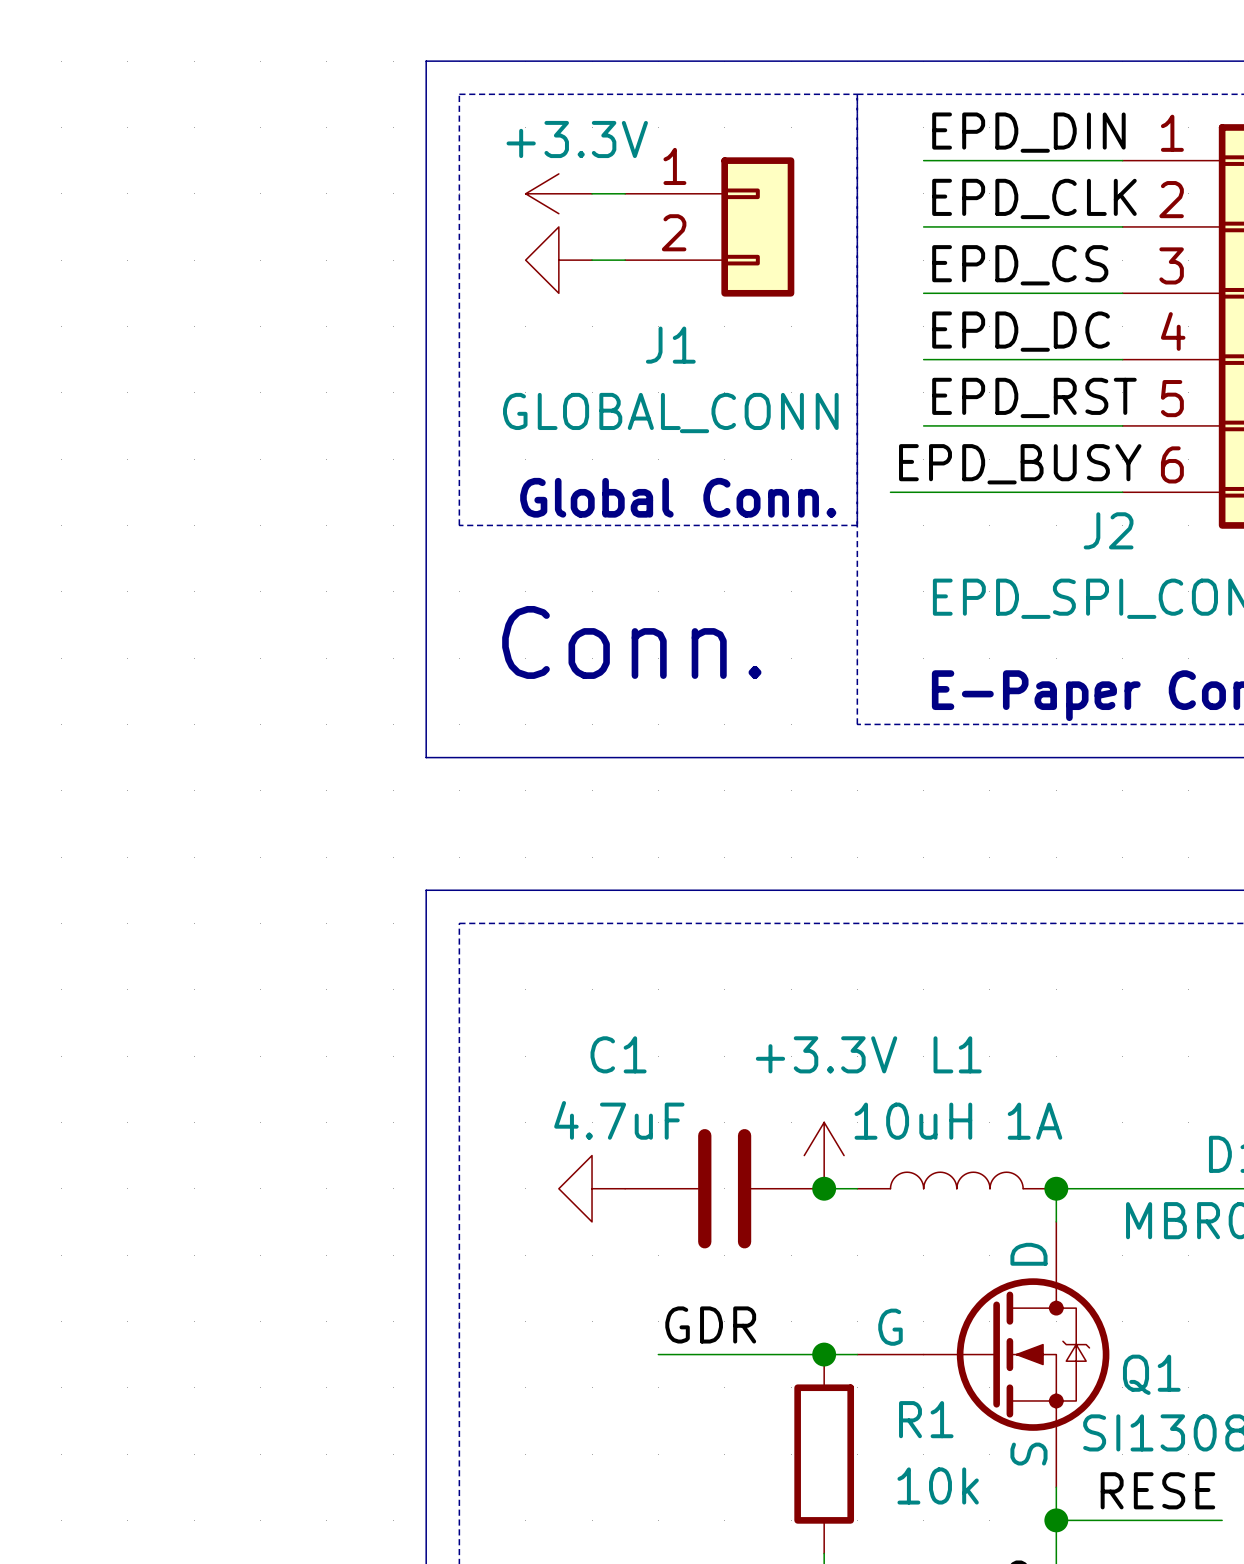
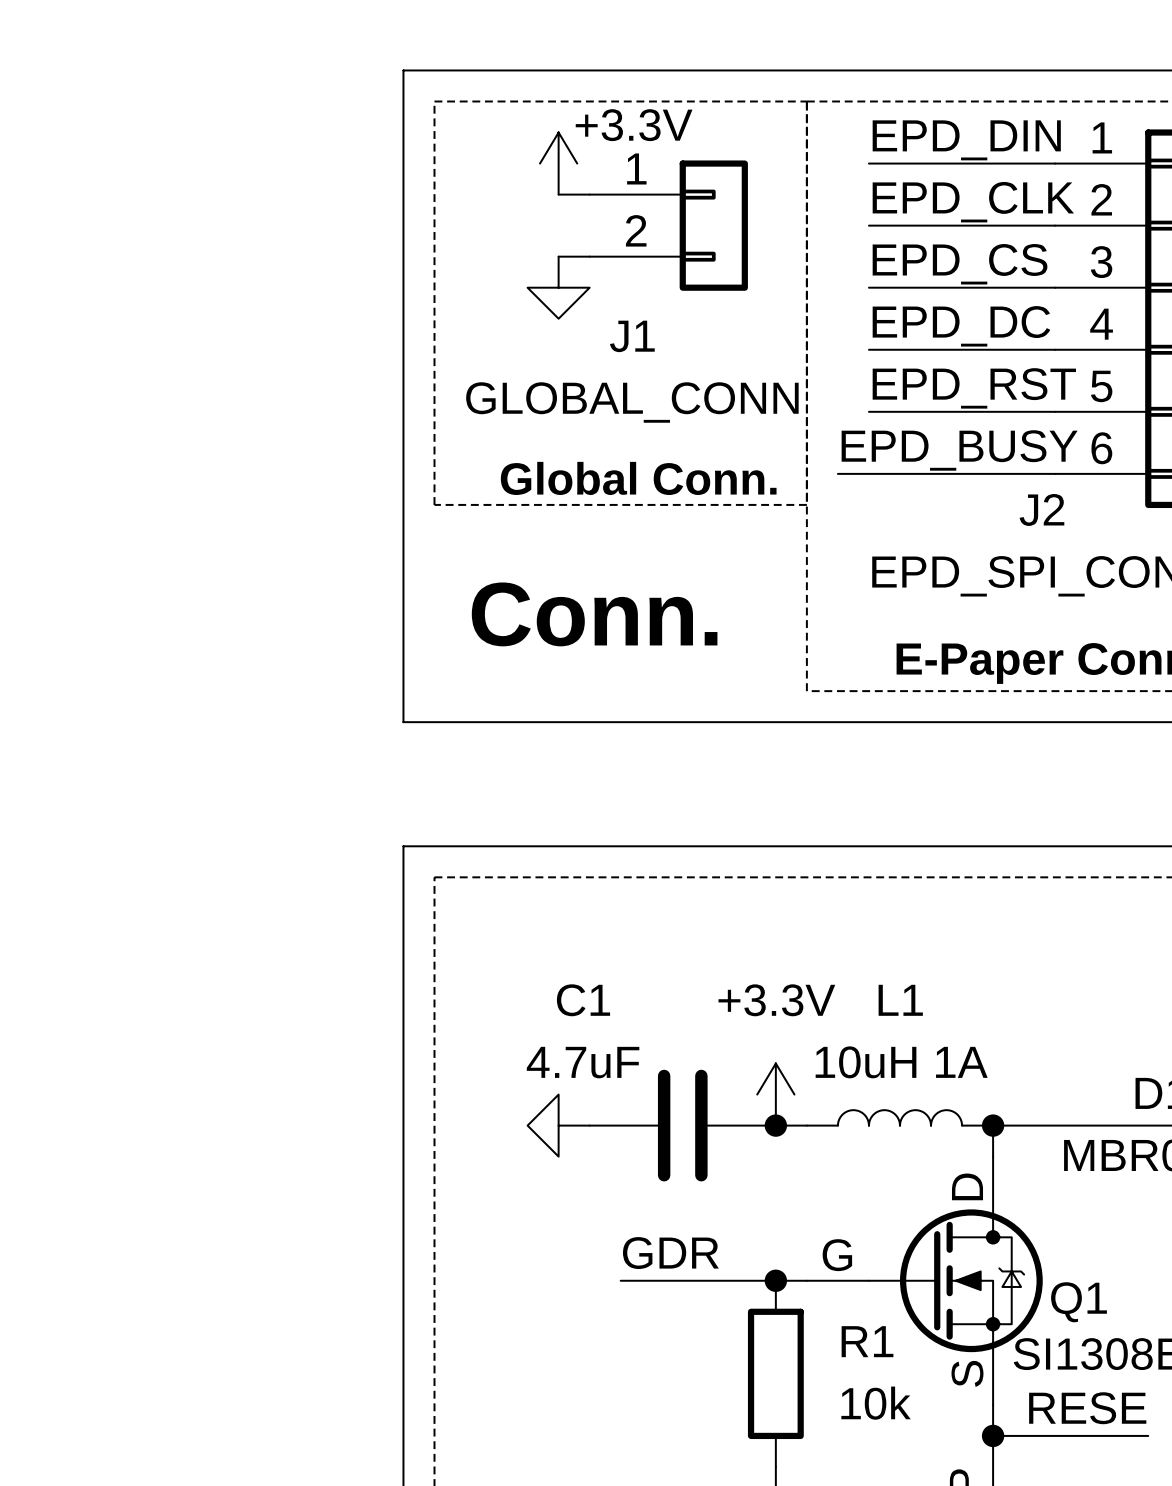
power symbol rotation: 0° (558, 193) -> 90° clockwise (558, 163)
power symbol position: +3.3V (558, 193) -> +3.3V (558, 163)
power symbol rotation: 0° (558, 260) -> 90° counterclockwise (558, 287)
power symbol position: (558, 260) -> (558, 287)

